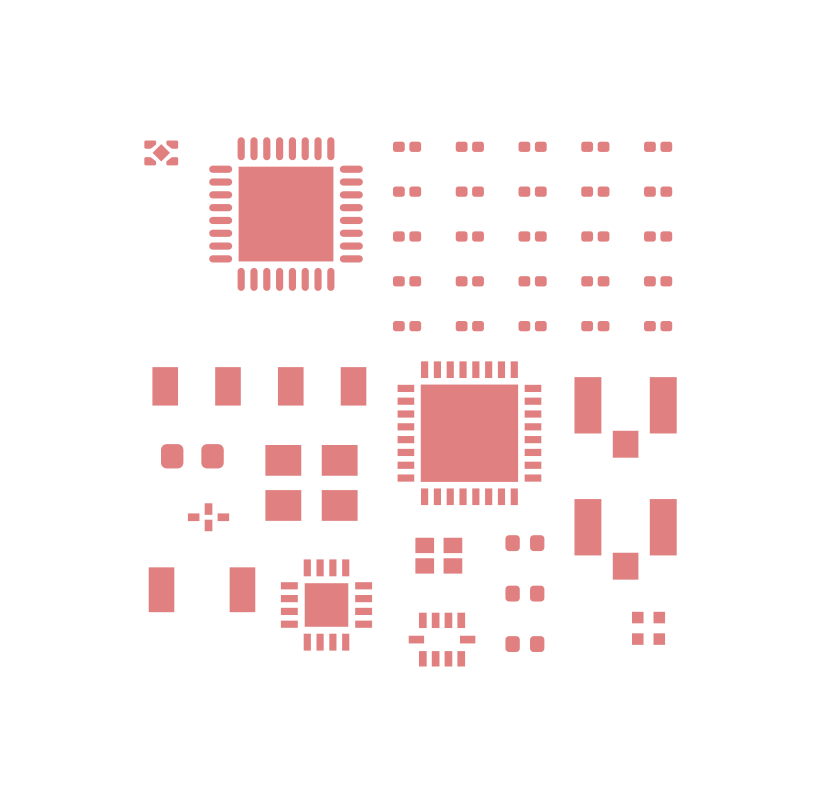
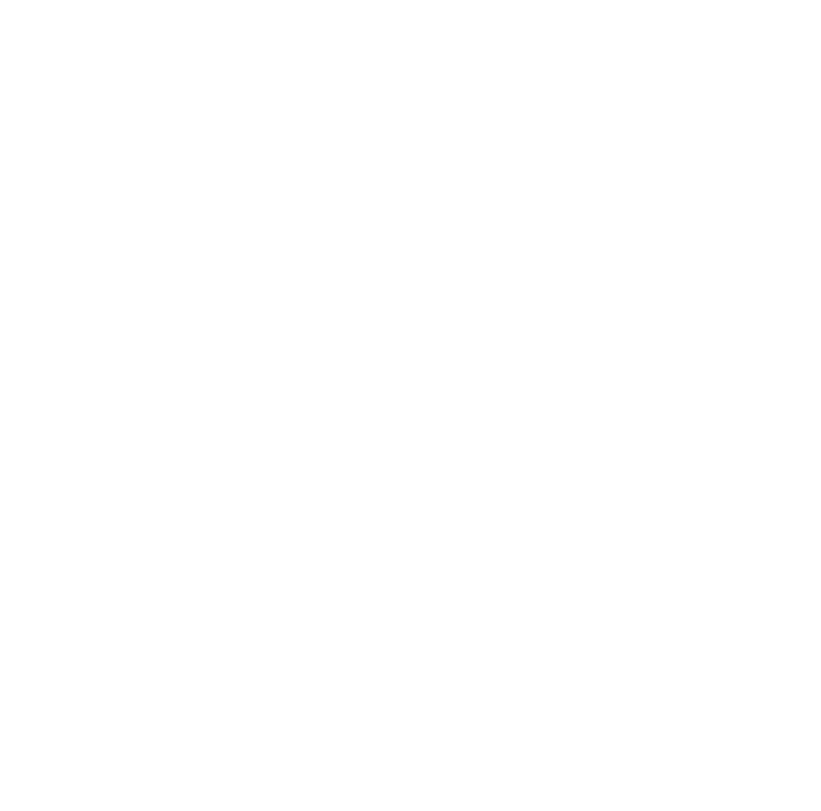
part: (407, 146) -> none
part: (469, 146) -> none
part: (532, 146) -> none
part: (595, 146) -> none
part: (658, 146) -> none
part: (161, 152) -> none
part: (407, 191) -> none
part: (469, 191) -> none
part: (532, 191) -> none
part: (595, 191) -> none
part: (658, 191) -> none
part: (286, 214) -> none
part: (407, 236) -> none
part: (469, 236) -> none
part: (532, 236) -> none
part: (595, 236) -> none
part: (658, 236) -> none
part: (407, 281) -> none
part: (469, 281) -> none
part: (532, 281) -> none
part: (595, 281) -> none
part: (658, 281) -> none
part: (407, 326) -> none
part: (469, 326) -> none
part: (532, 326) -> none
part: (595, 326) -> none
part: (658, 326) -> none
part: (165, 386) -> none
part: (227, 386) -> none
part: (290, 386) -> none
part: (353, 386) -> none
part: (625, 417) -> none
part: (469, 433) -> none
part: (192, 456) -> none
part: (311, 482) -> none
part: (208, 517) -> none
part: (625, 539) -> none
part: (524, 543) -> none
part: (438, 555) -> none
part: (201, 589) -> none
part: (524, 593) -> none
part: (326, 605) -> none
part: (648, 628) -> none
part: (442, 639) -> none
part: (524, 644) -> none

